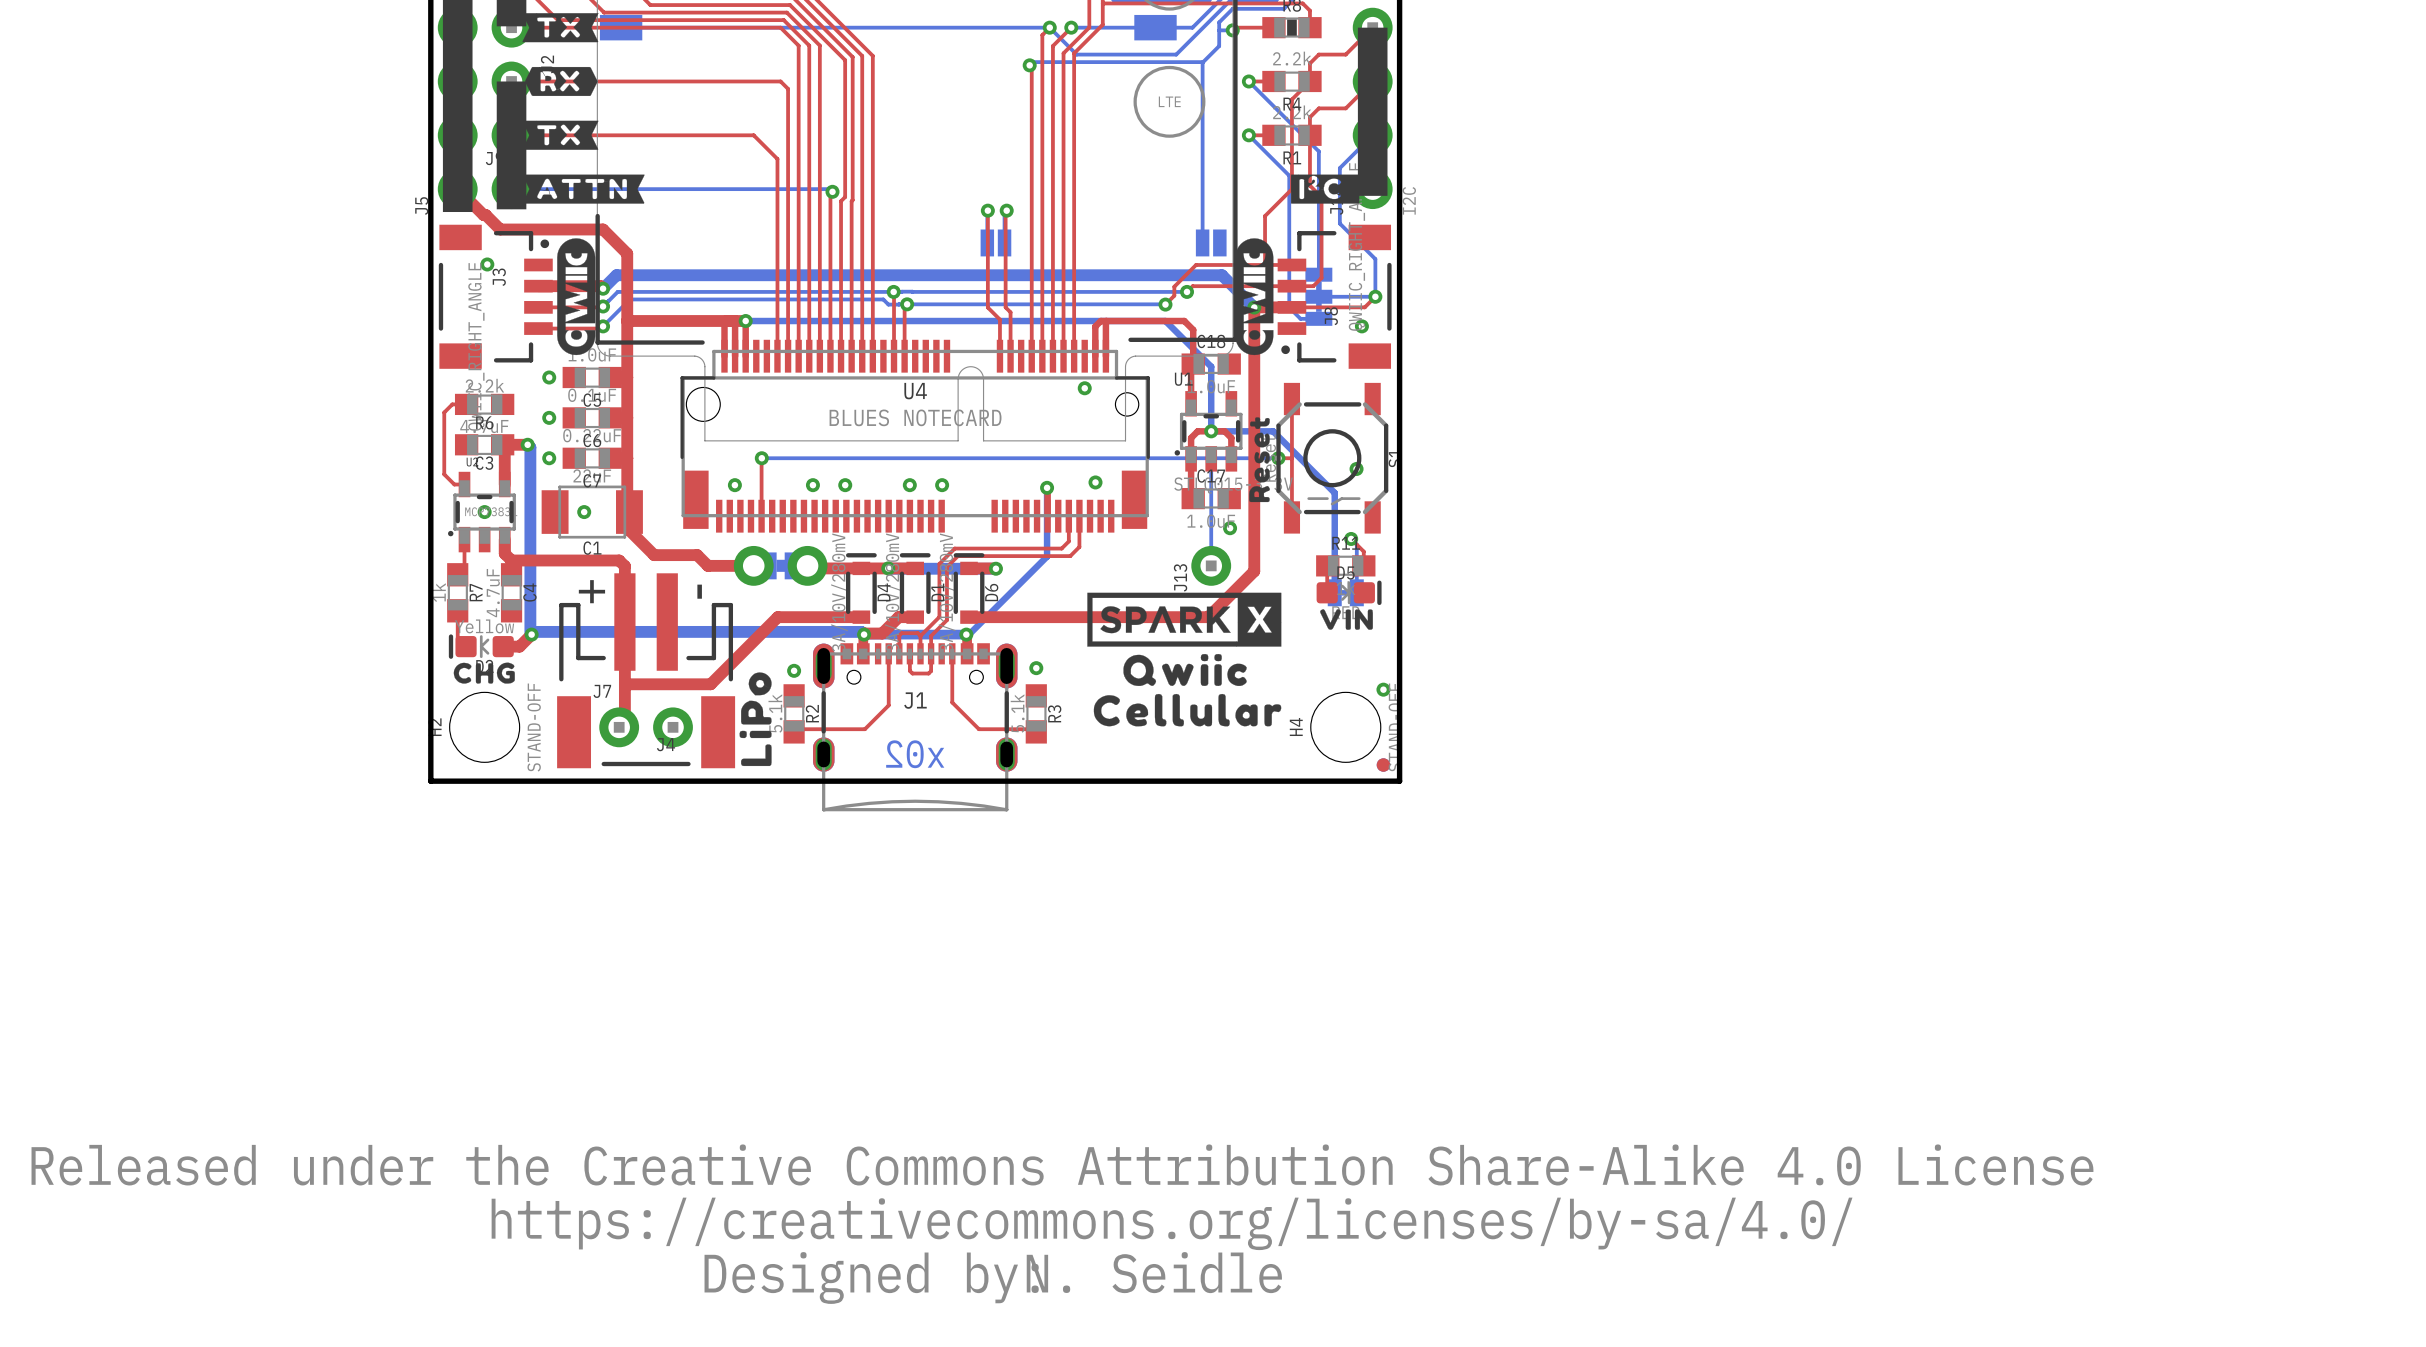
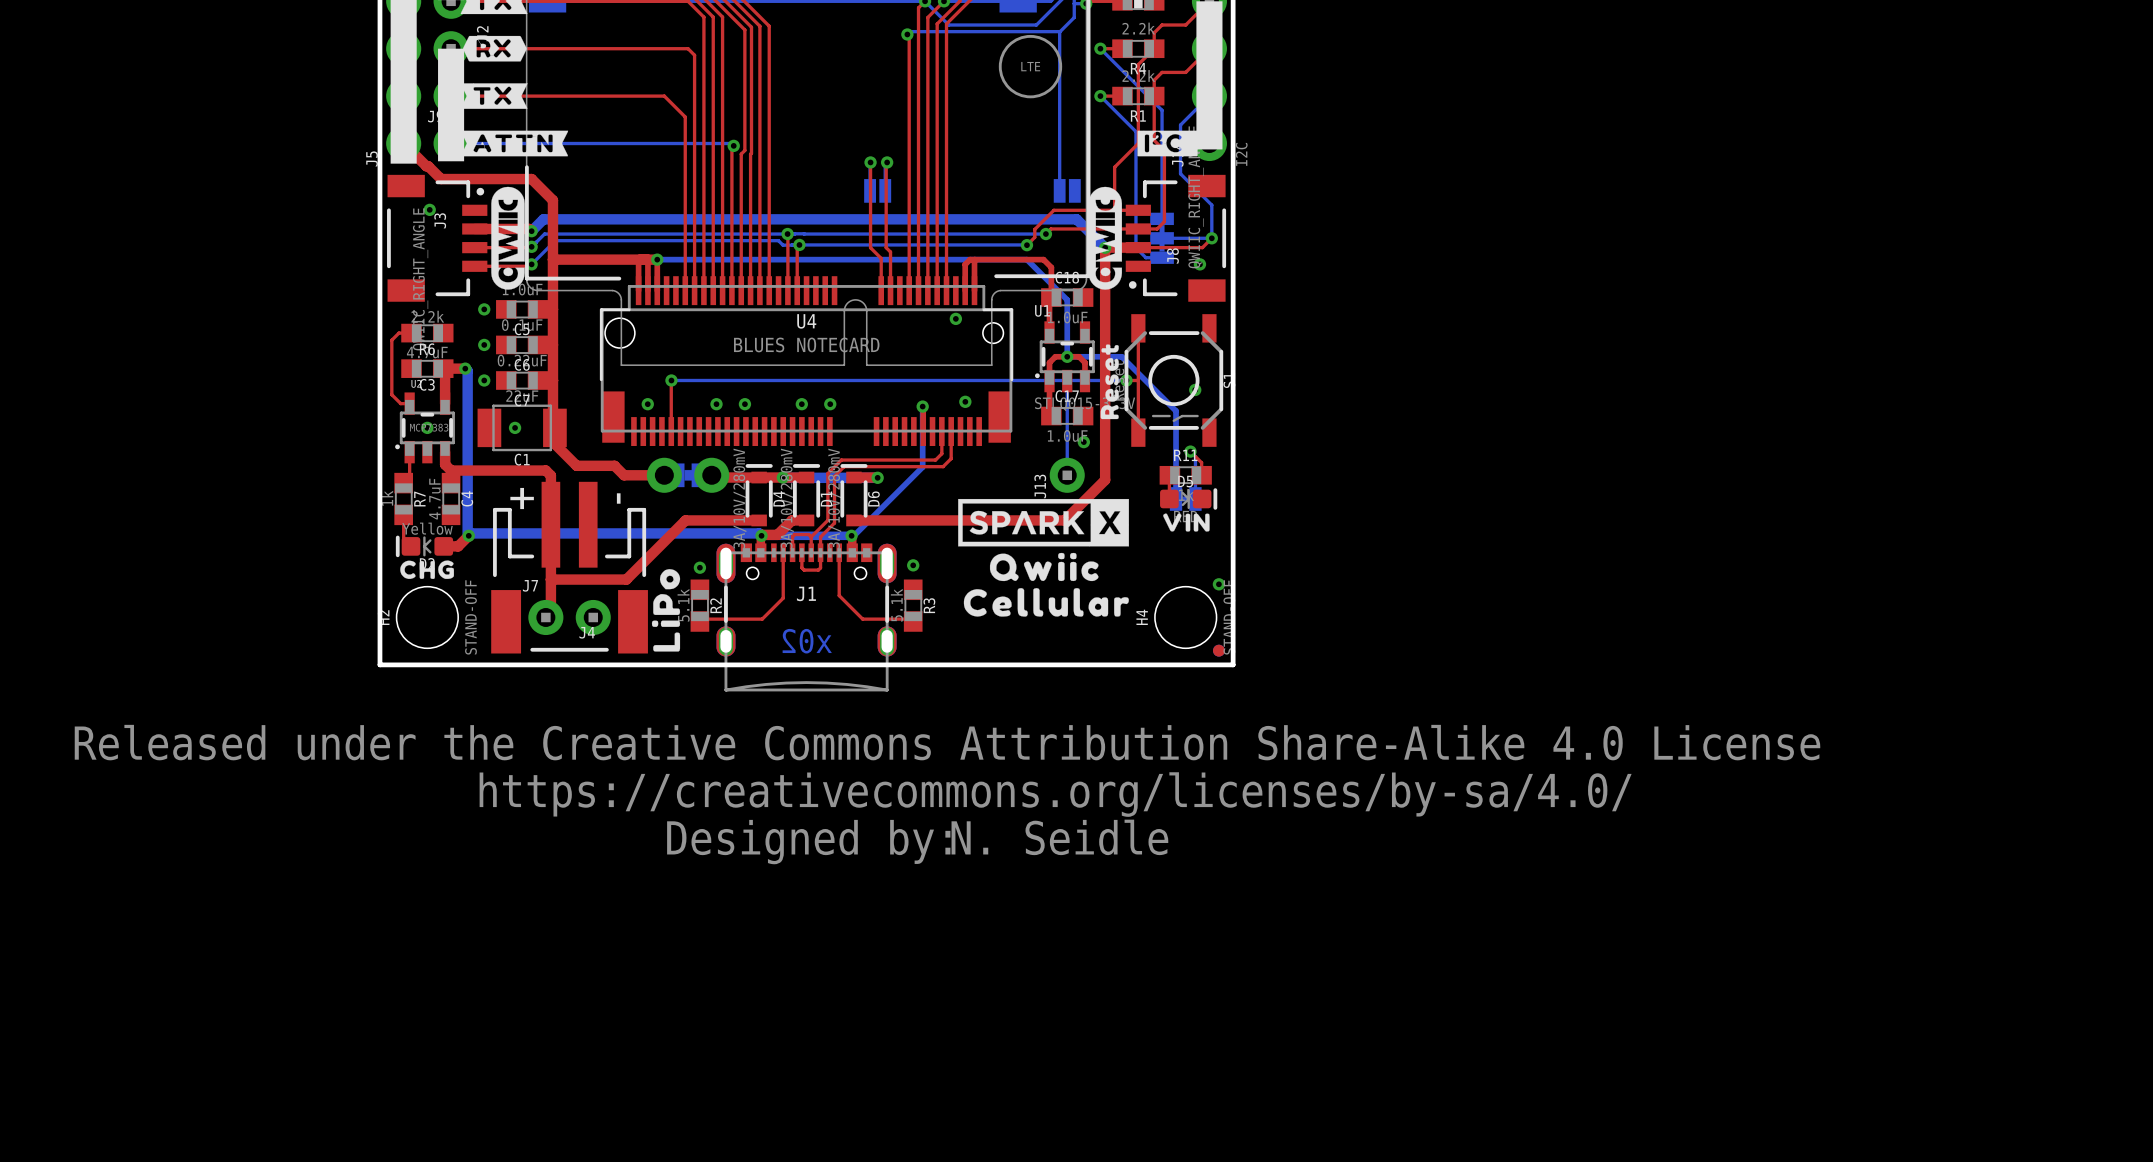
drawing position: (1062, 1224) -> (947, 794)
text position: N. Seidle (1154, 1272) -> N. Seidle (1059, 837)

